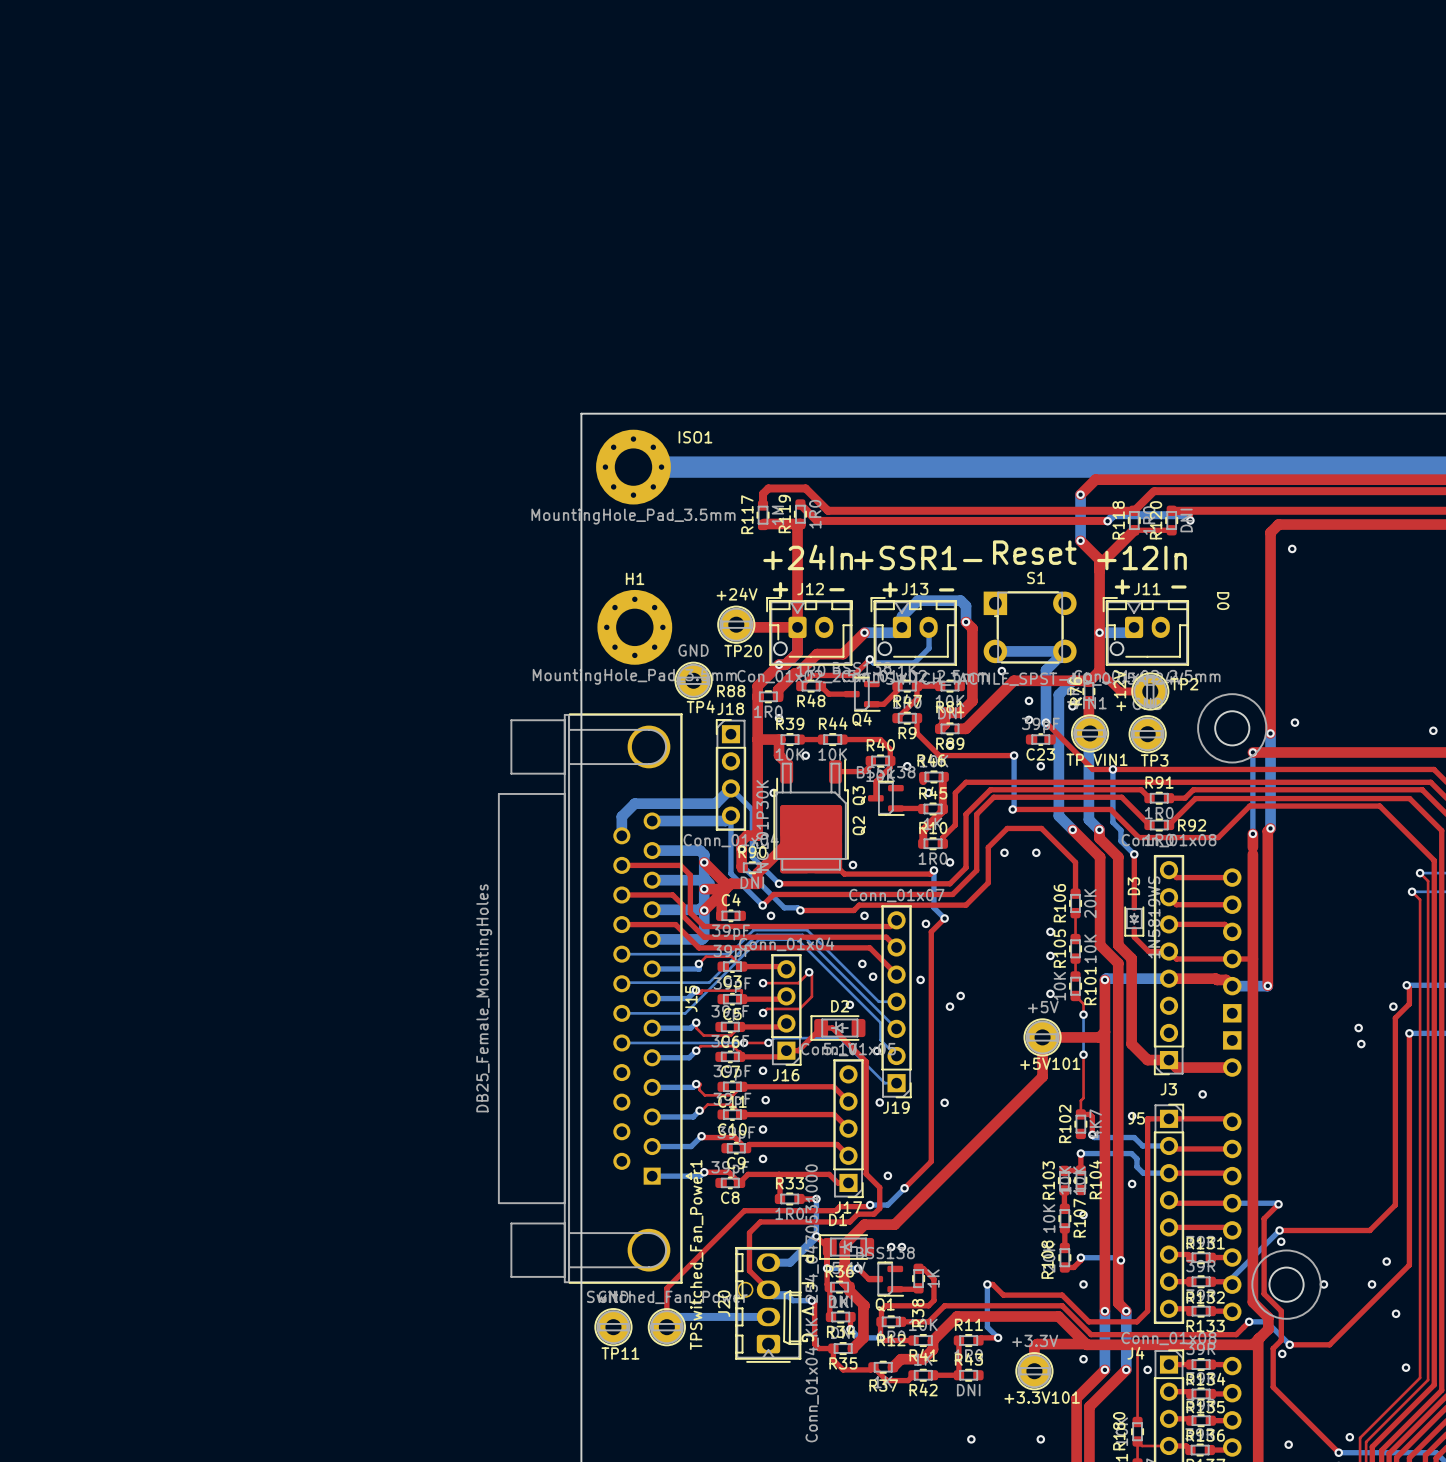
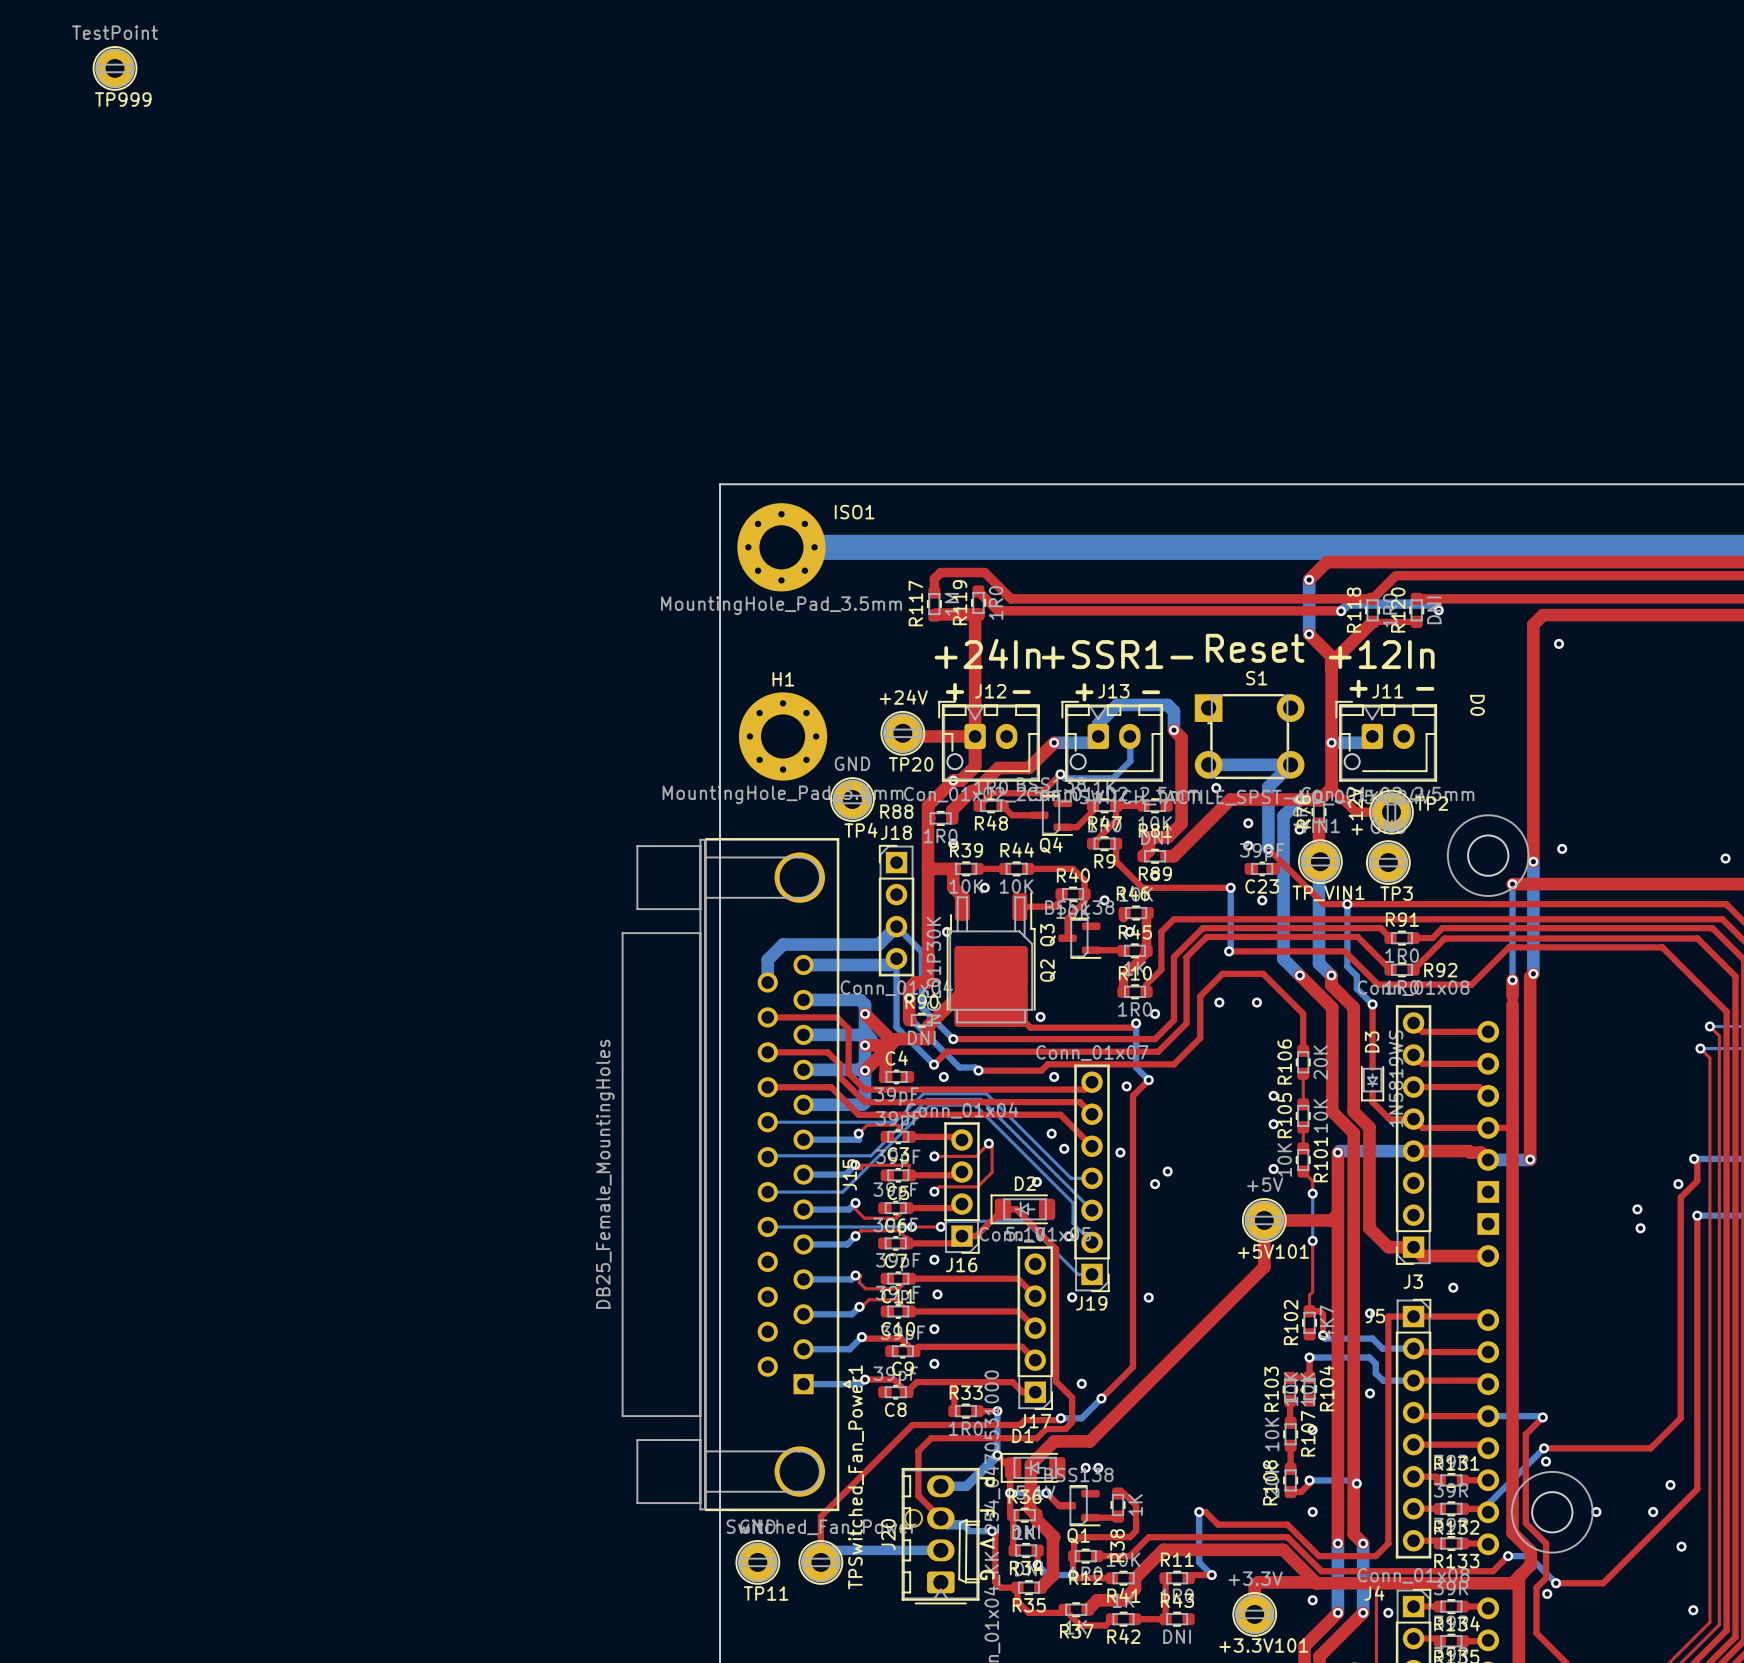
TP999: none -> TestPoint (115, 68)

